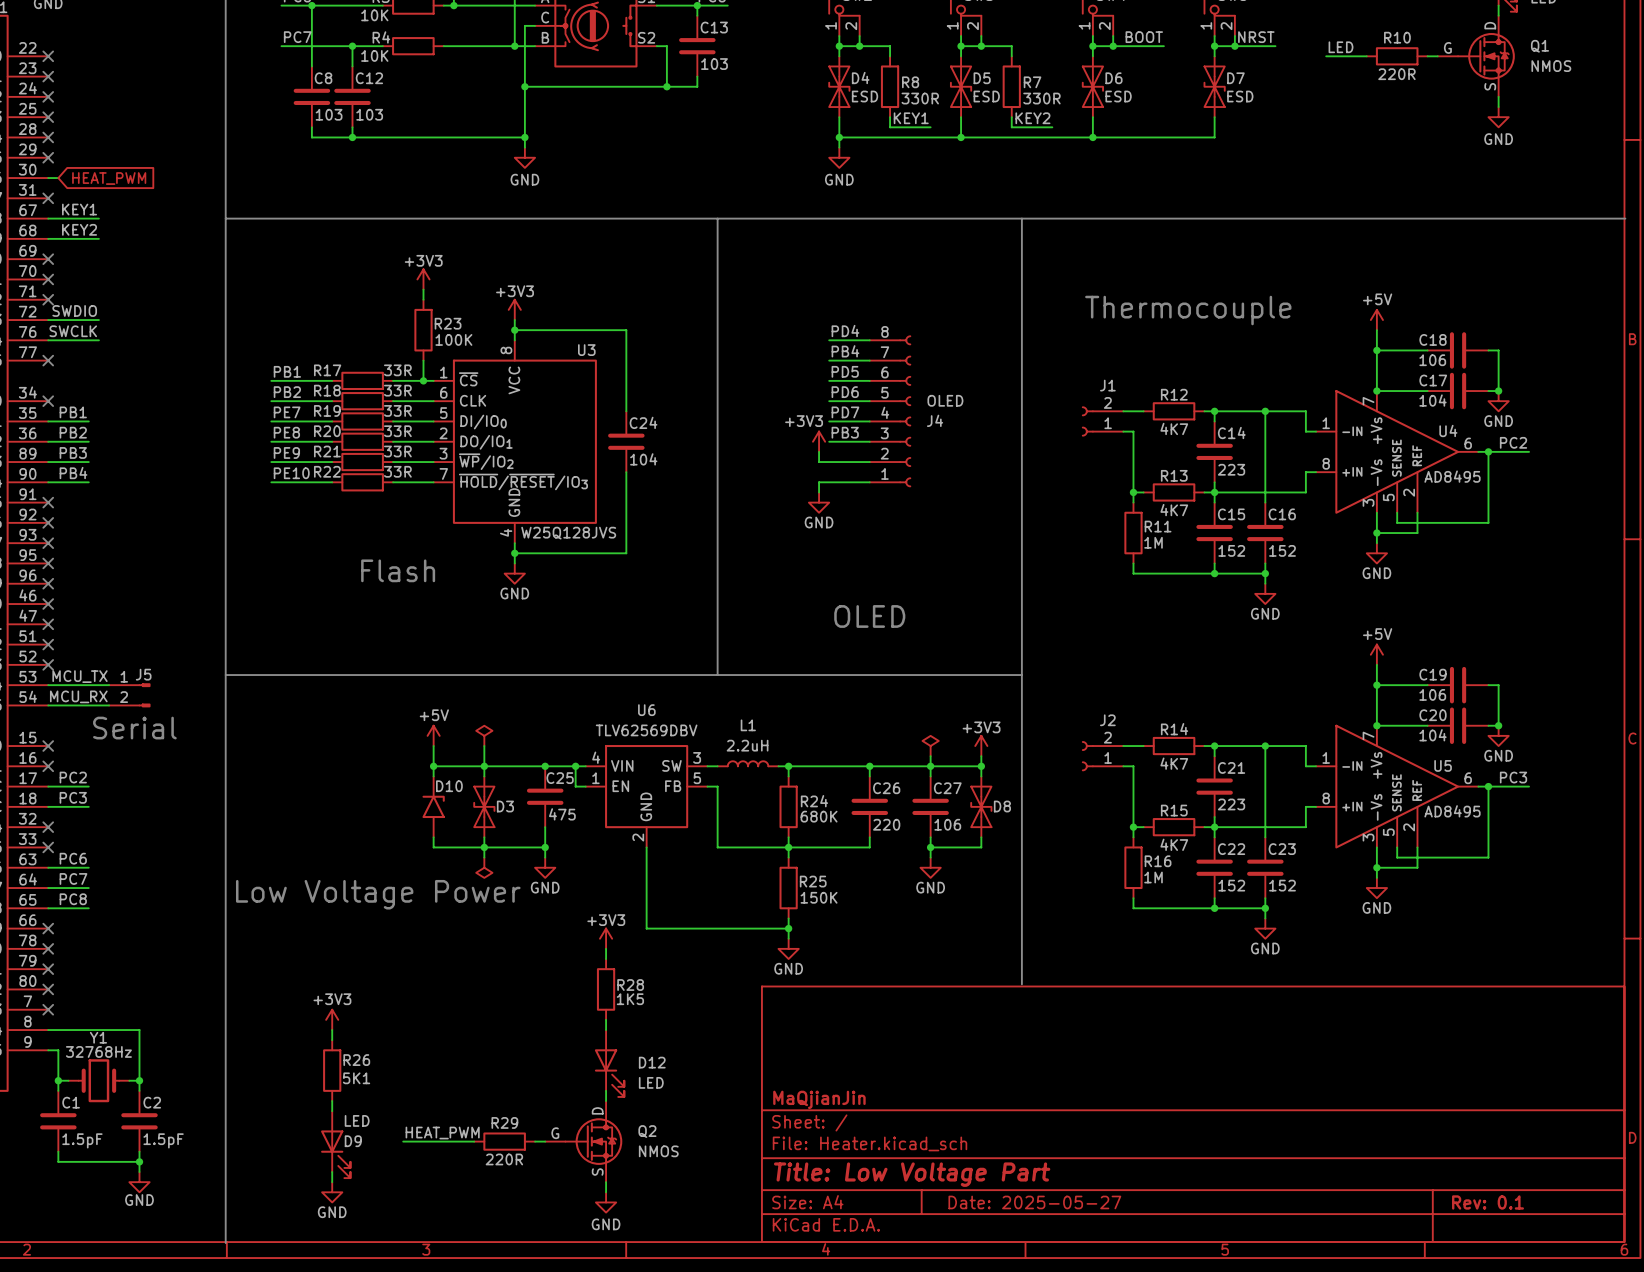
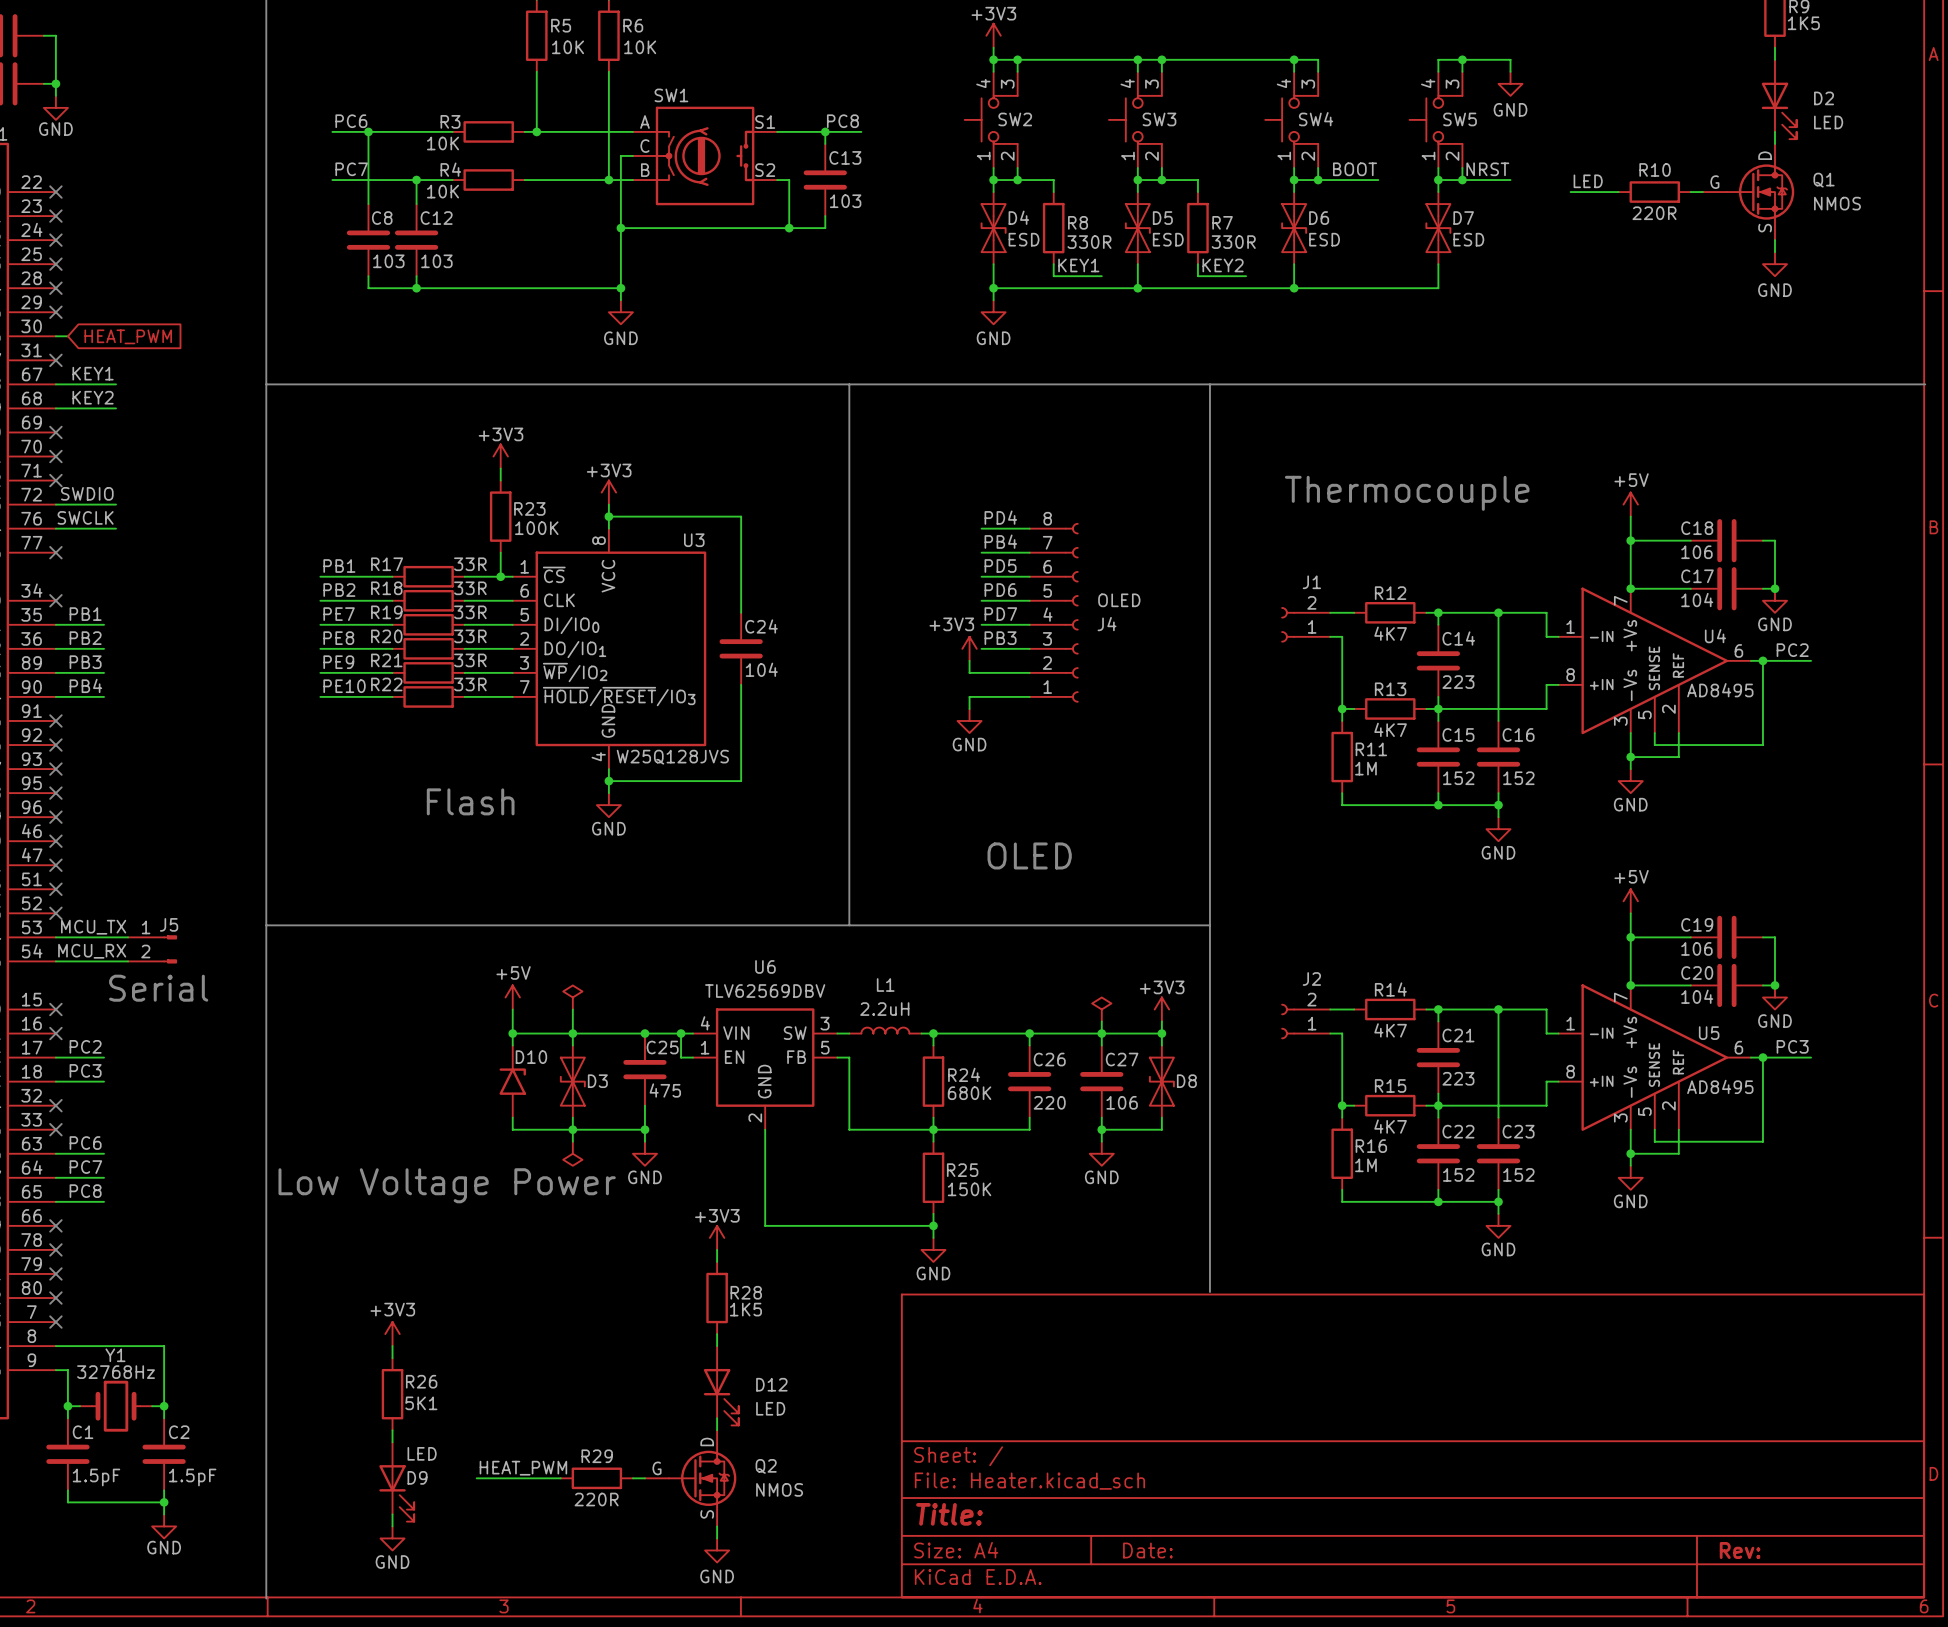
title block: MaQjianJin (819, 1099) -> none
title block: Title: Low Voltage Part (912, 1174) -> Title: (949, 1514)
title block: Date: 2025-05-27 (1034, 1202) -> Date: (1147, 1550)
title block: Rev: 0.1 (1488, 1202) -> Rev: (1740, 1550)

